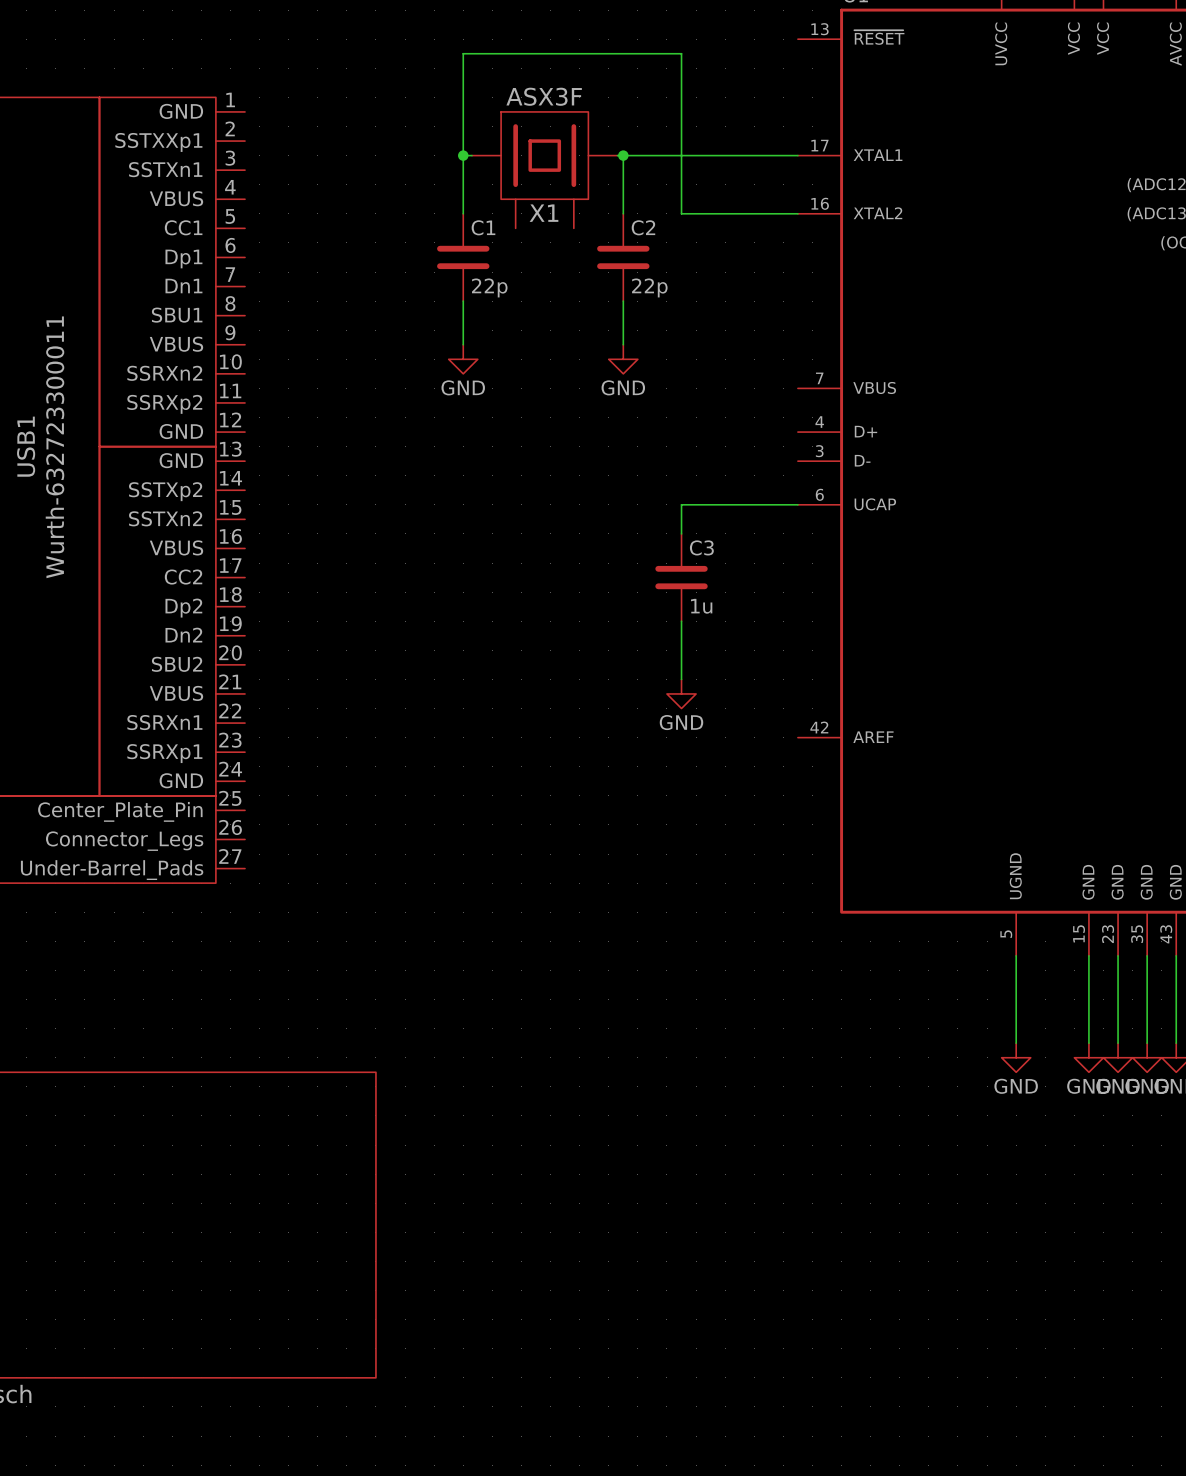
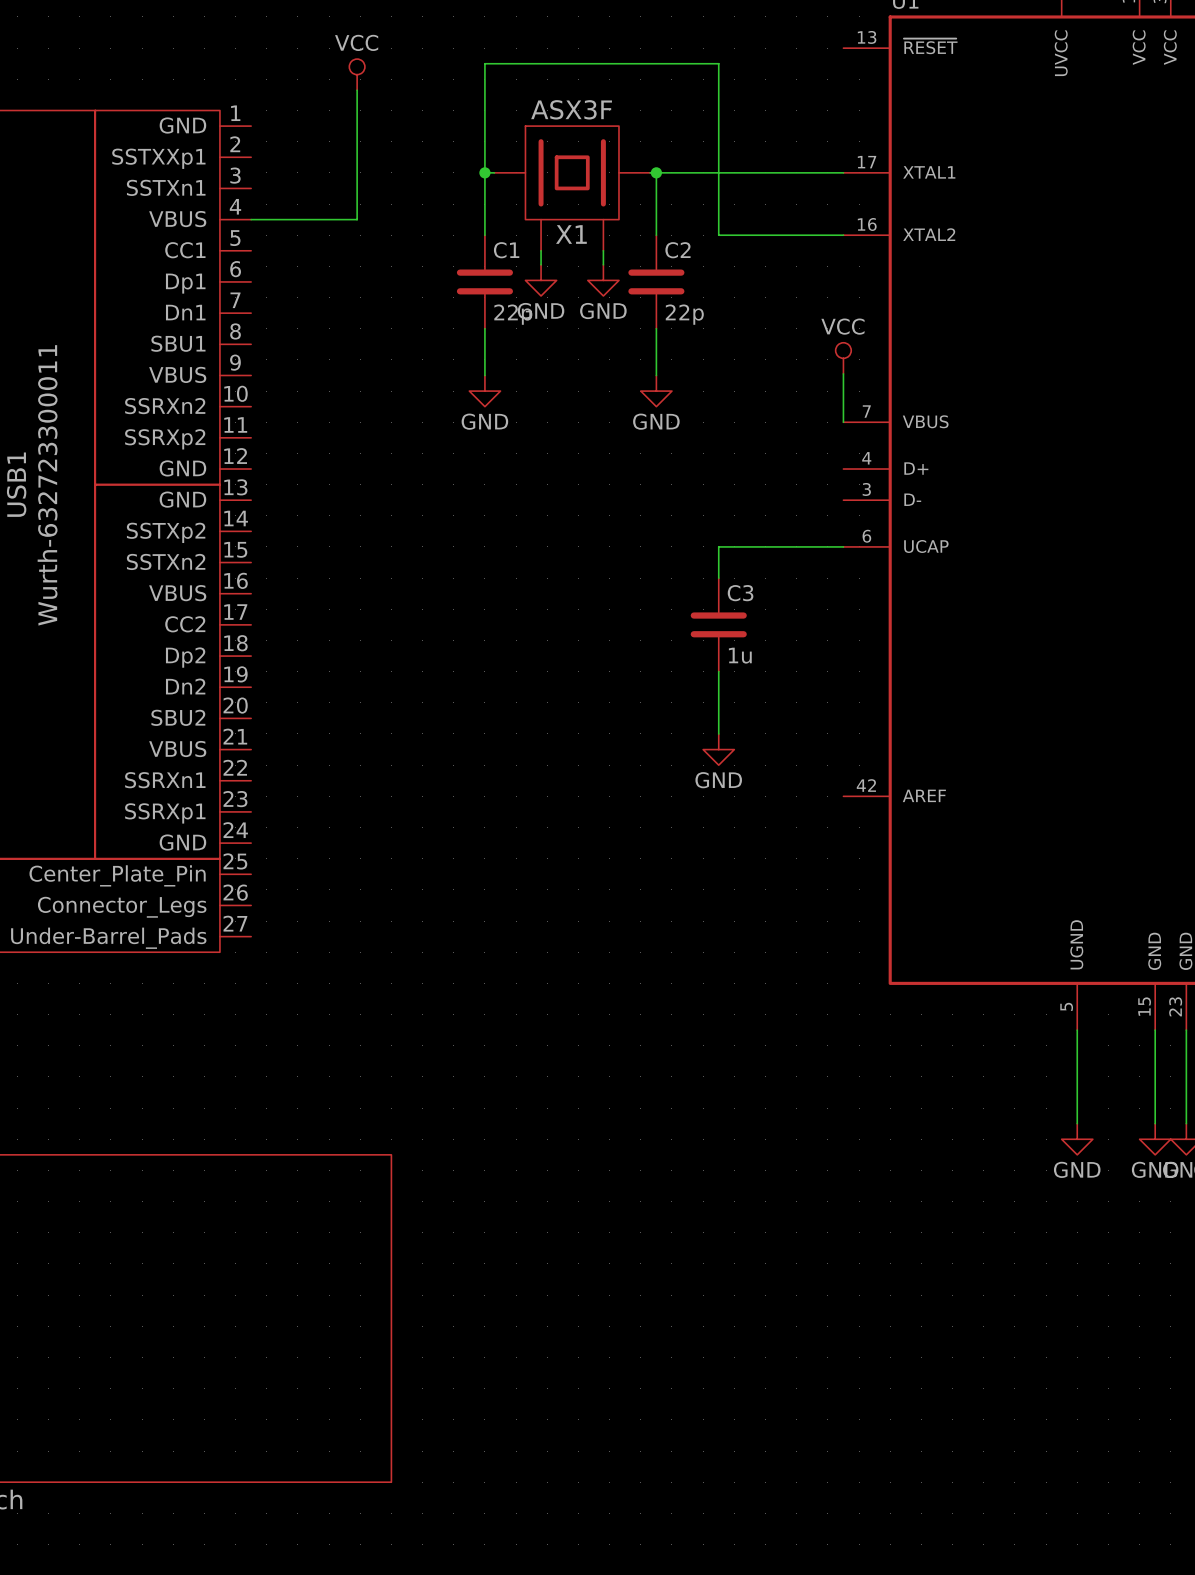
power symbol: none -> VCC (357, 74)
wire: none -> (357, 90) (357, 219) (251, 219)
wire: none -> (541, 250) (541, 264)
wire: none -> (603, 250) (603, 264)
power symbol: none -> GND (541, 280)
power symbol: none -> GND (603, 280)
power symbol: none -> VCC (843, 358)
wire: none -> (843, 373) (843, 422)

